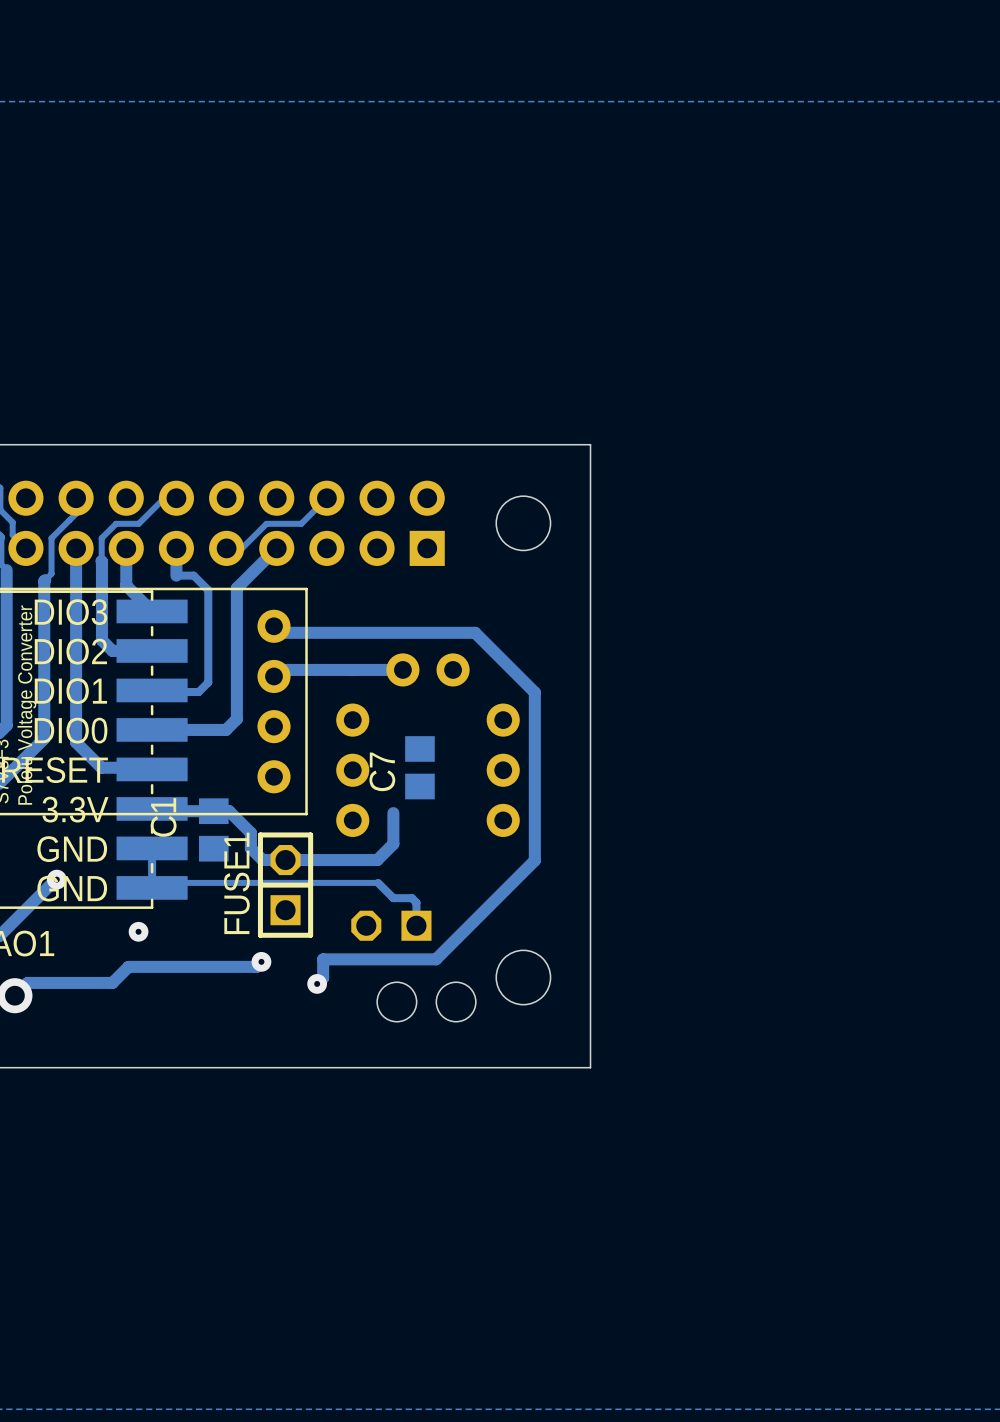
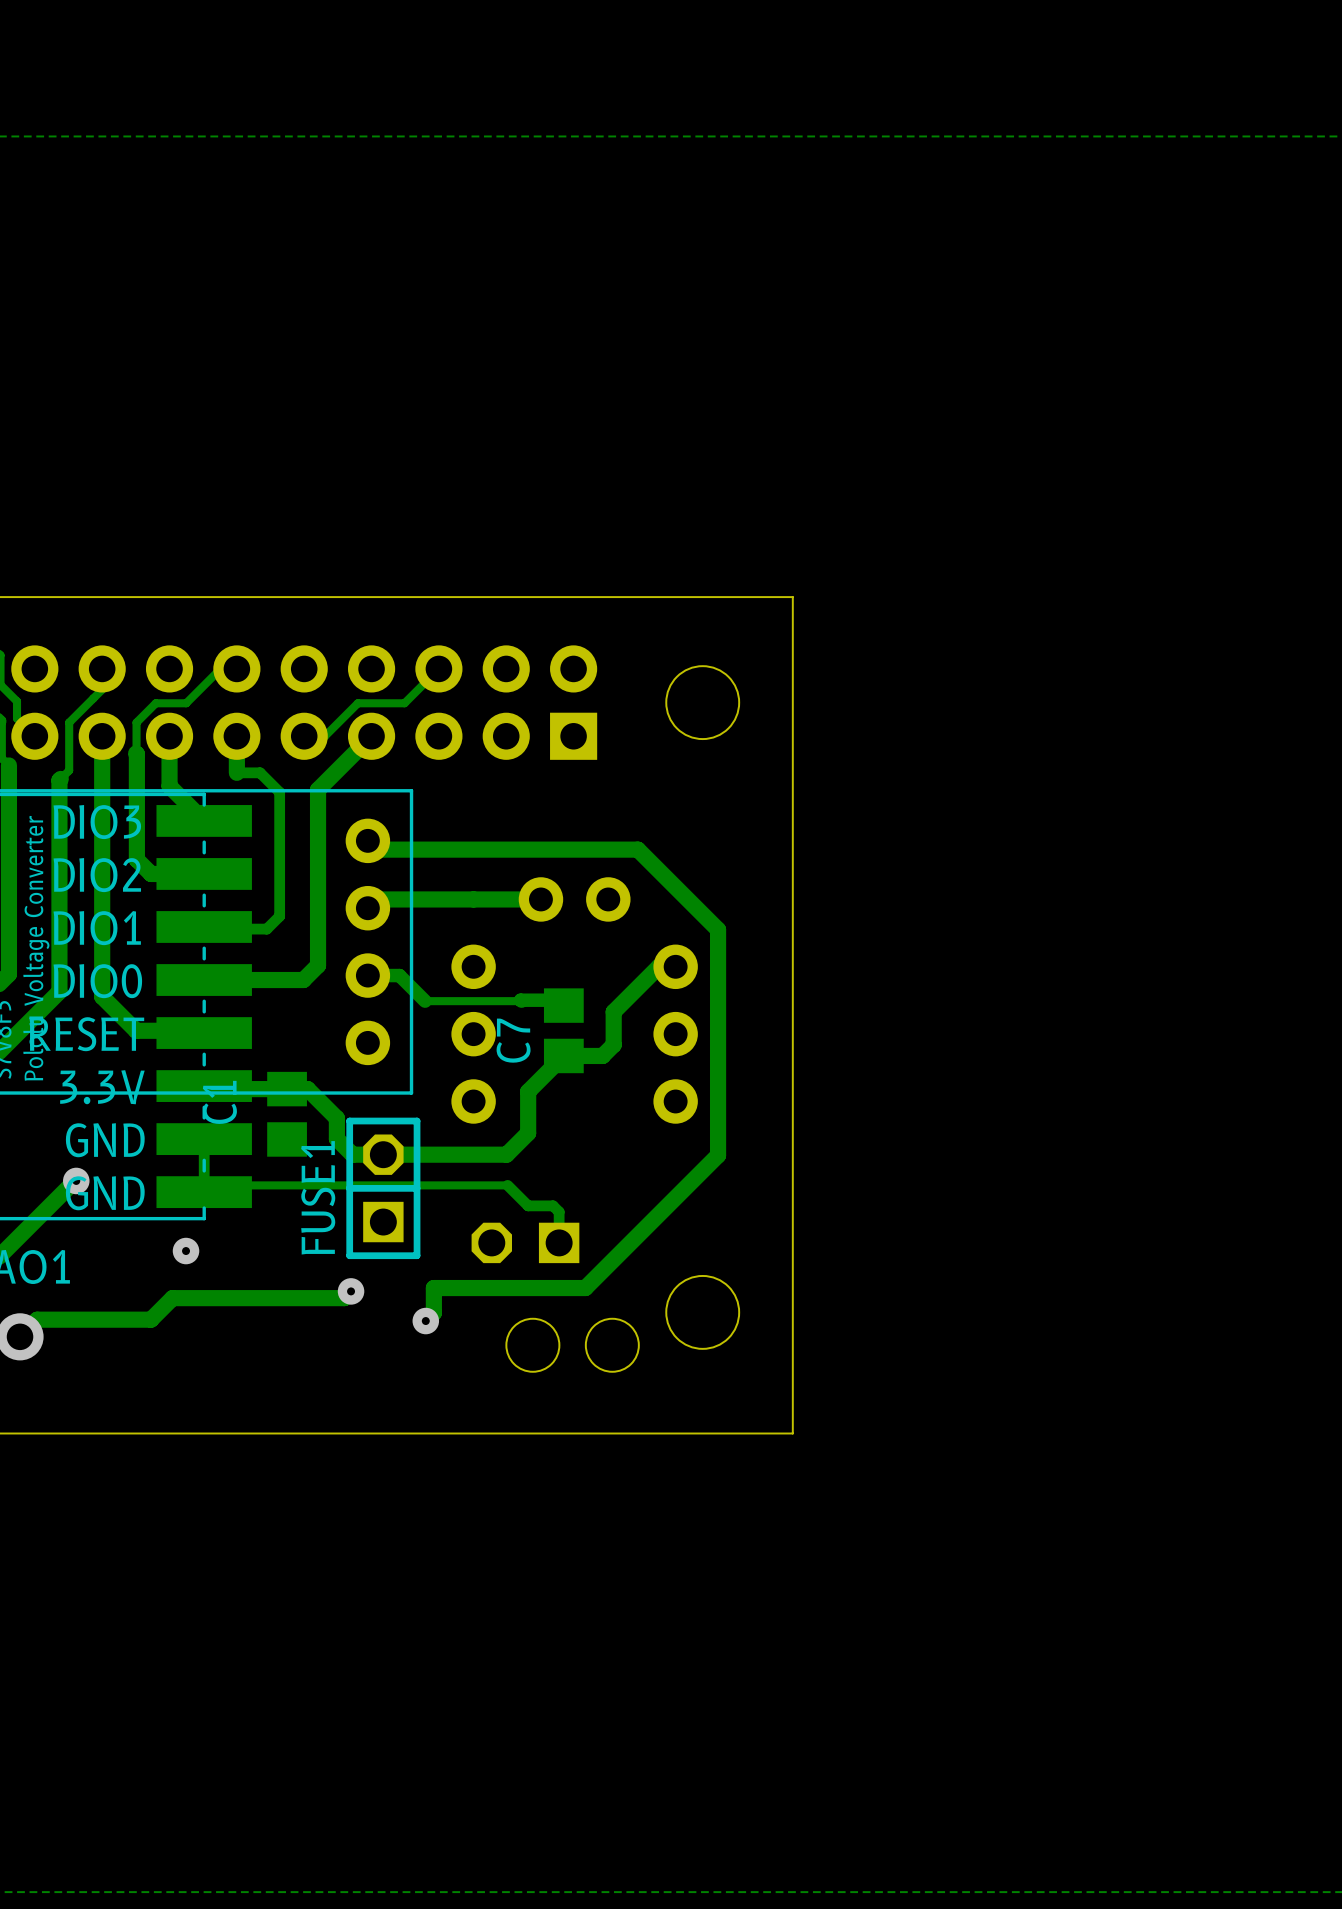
track: none -> (675, 966) (658, 966) (613, 1011) (613, 1044) (602, 1055) (563, 1055) (528, 1091)
track: none -> (367, 975) (399, 975) (425, 1001) (558, 1000) (563, 1005)

